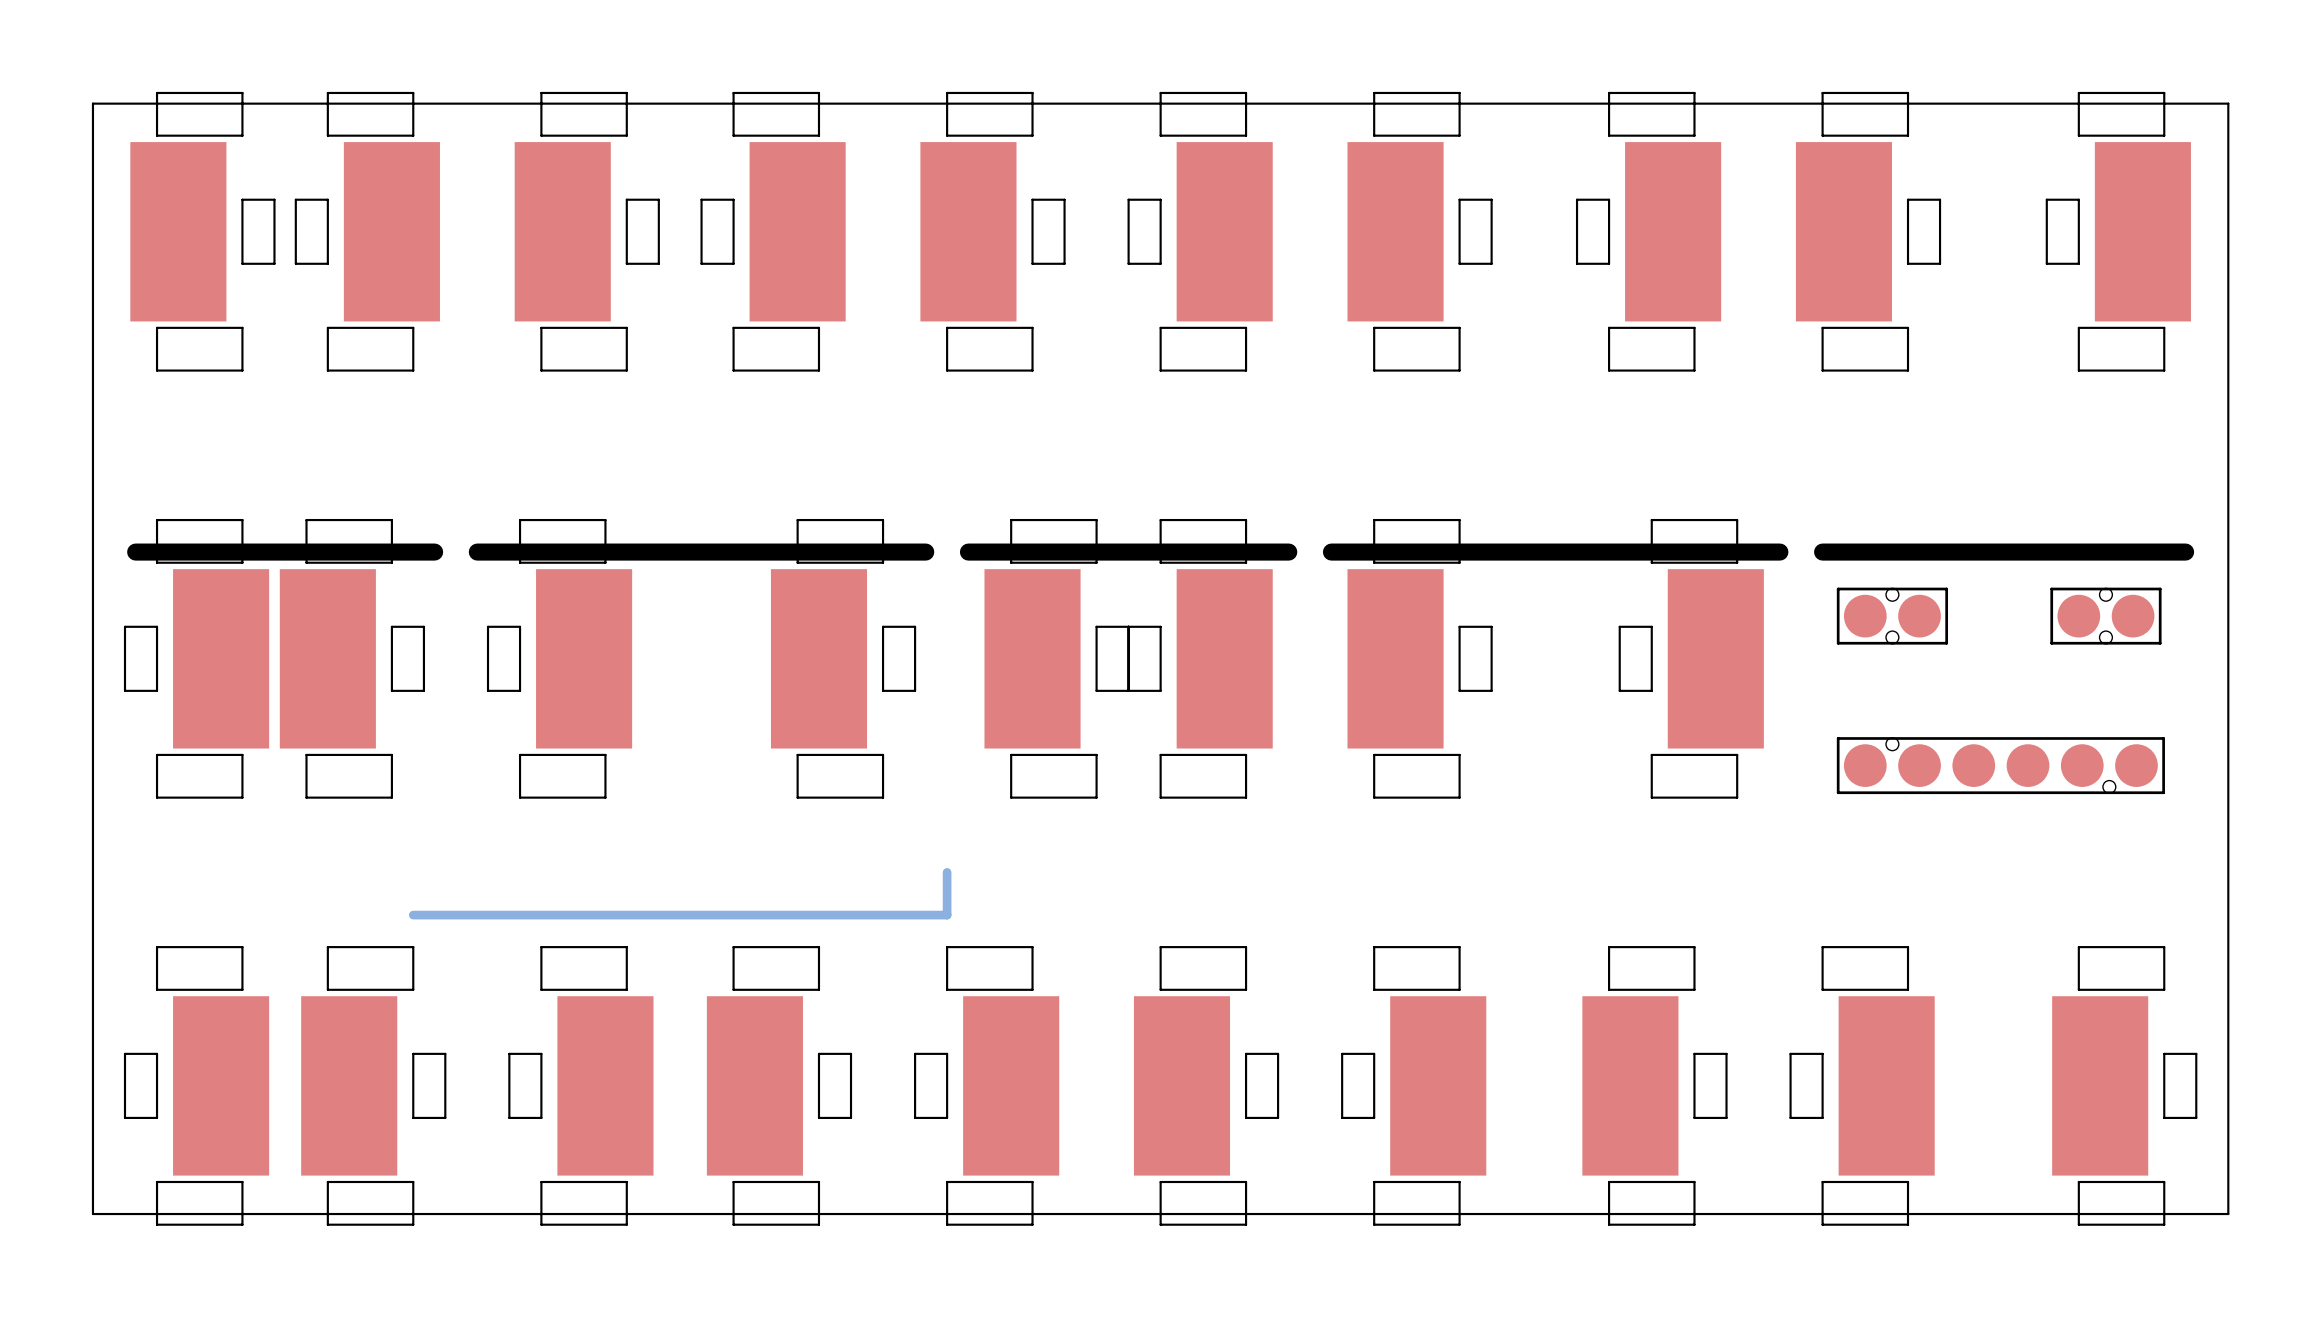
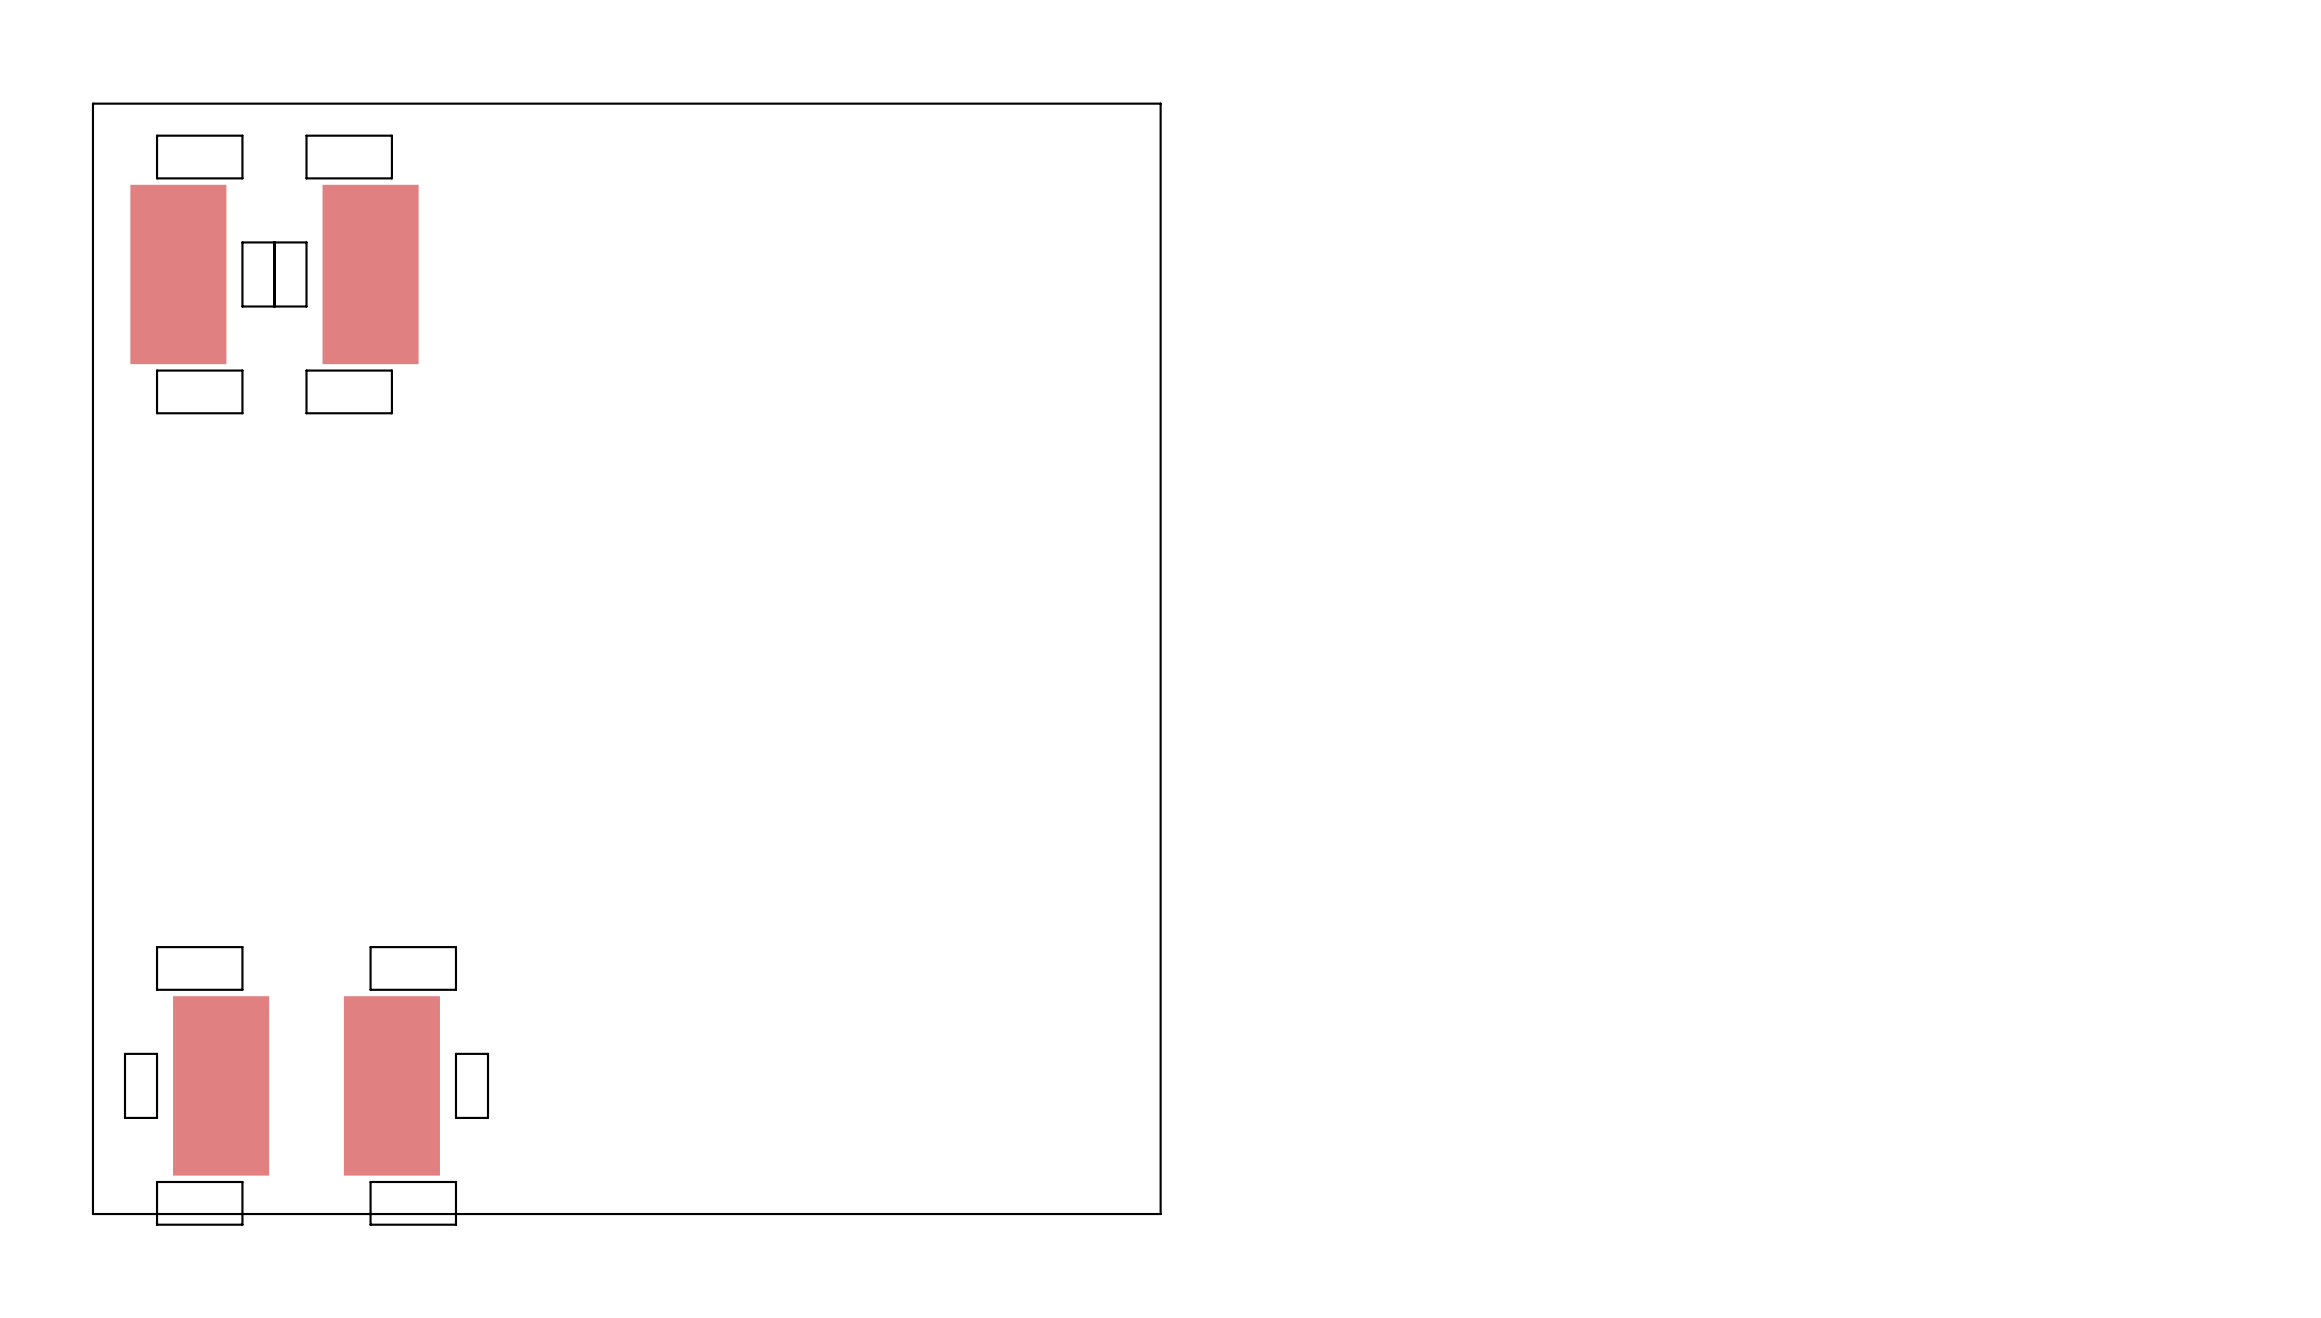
board edge: (1160, 103) (2228, 103) (2228, 1214) (1160, 1214) -> (1160, 103) (1160, 1214)
part position: (202, 231) -> (202, 274)
part position: (367, 231) -> (346, 274)
part: (587, 231) -> none
part: (773, 231) -> none
part: (993, 231) -> none
part: (1200, 231) -> none
part: (1420, 231) -> none
part: (1648, 231) -> none
part: (1868, 231) -> none
part: (2118, 231) -> none
board edge: (135, 552) (434, 552) -> none
board edge: (477, 552) (925, 552) -> none
board edge: (968, 552) (1288, 552) -> none
board edge: (1331, 552) (1779, 552) -> none
board edge: (1822, 552) (2185, 552) -> none
part: (1892, 616) -> none
part: (2105, 616) -> none
part: (196, 658) -> none
part: (352, 658) -> none
part: (559, 658) -> none
part: (843, 658) -> none
part: (1057, 658) -> none
part: (1200, 658) -> none
part: (1420, 658) -> none
part: (1691, 658) -> none
part: (2000, 765) -> none
bottom track: (947, 872) (947, 915) (413, 915) -> none
part position: (373, 1085) -> (416, 1085)
part: (580, 1085) -> none
part: (779, 1085) -> none
part: (986, 1085) -> none
part: (1206, 1085) -> none
part: (1413, 1085) -> none
part: (1654, 1085) -> none
part: (1862, 1085) -> none
part: (2124, 1085) -> none

